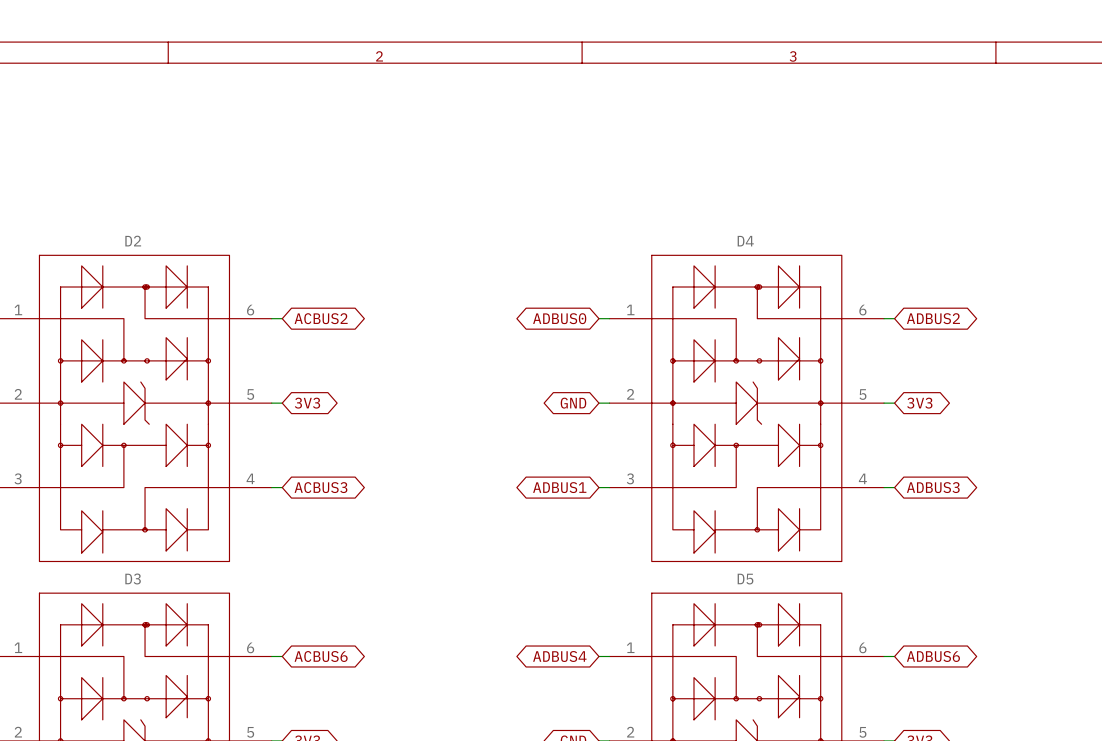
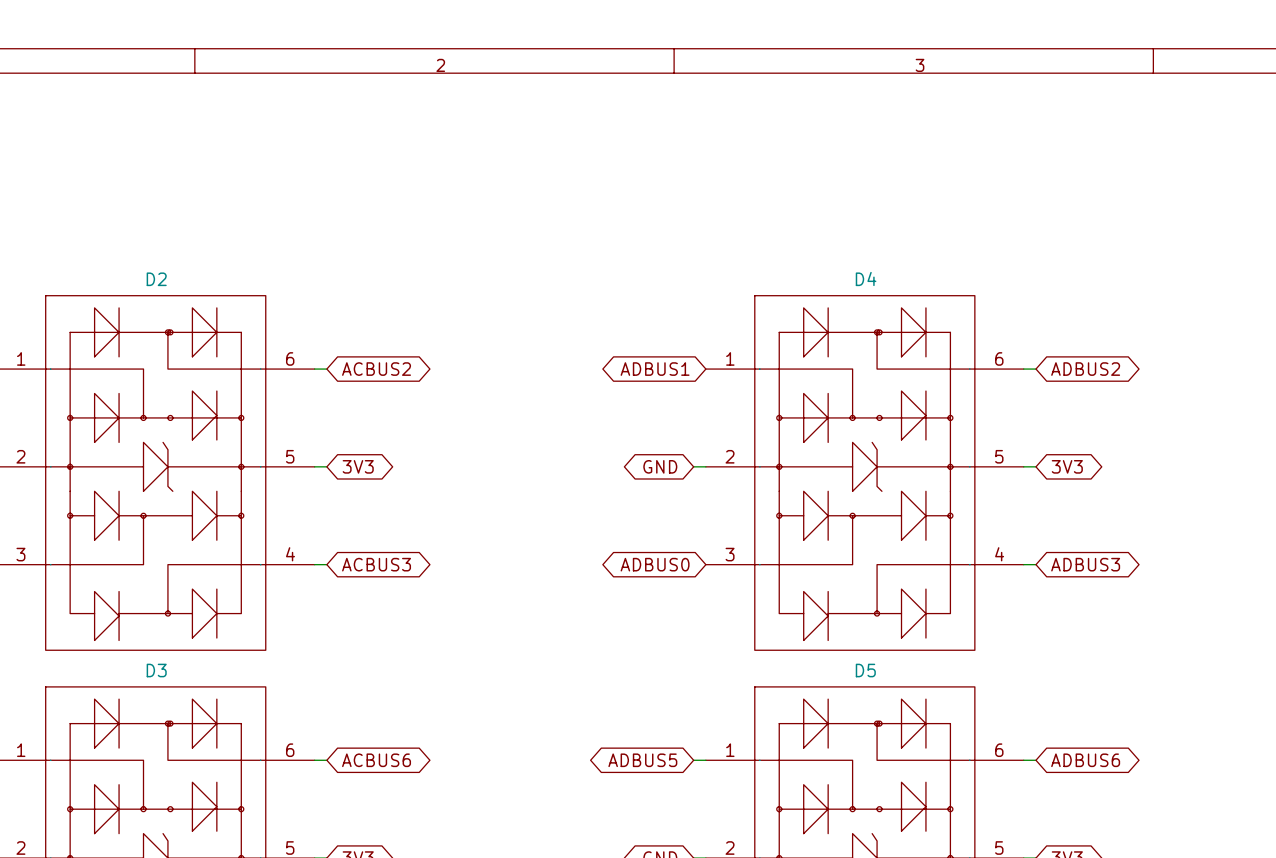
global label position: ADBUS0 (559, 318) -> ADBUS0 (655, 564)
wire: (598, 318) (609, 318) -> none
global label position: ADBUS1 (559, 487) -> ADBUS1 (655, 369)
wire: (598, 487) (609, 487) -> none
global label: ADBUS4 (559, 656) -> ADBUS5 (642, 760)

